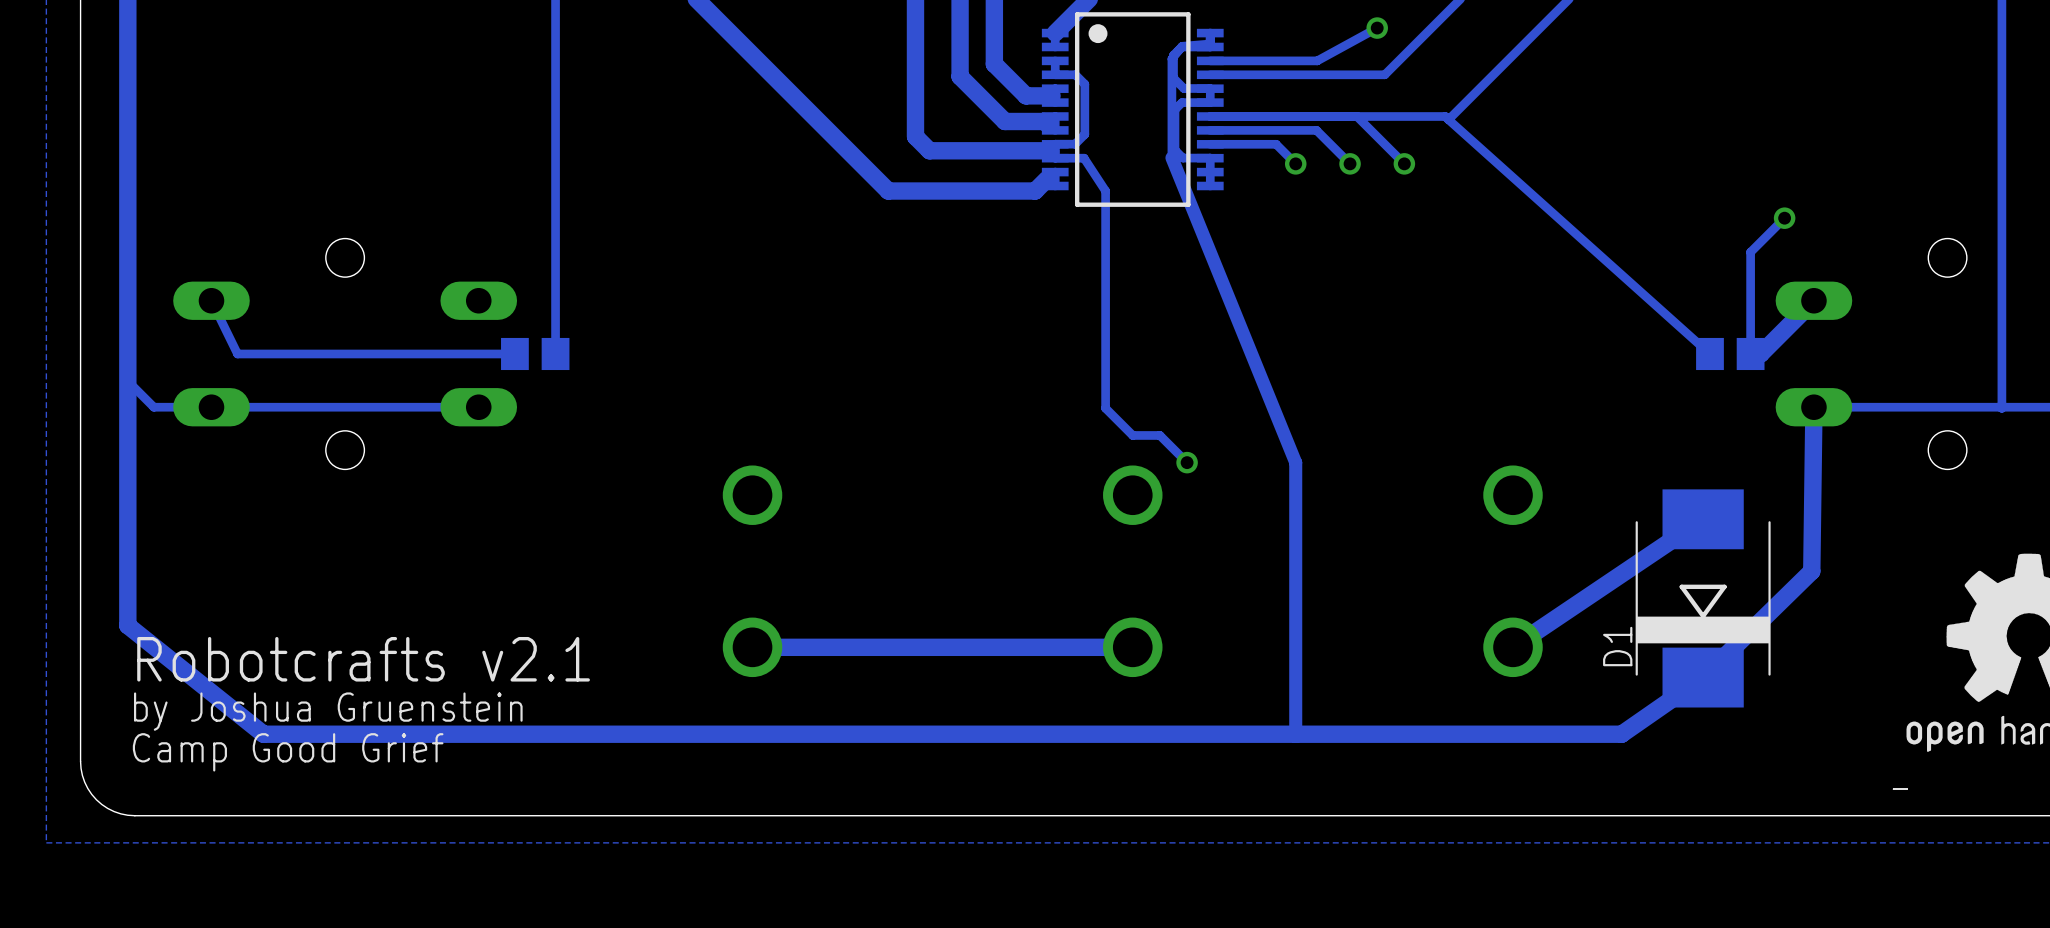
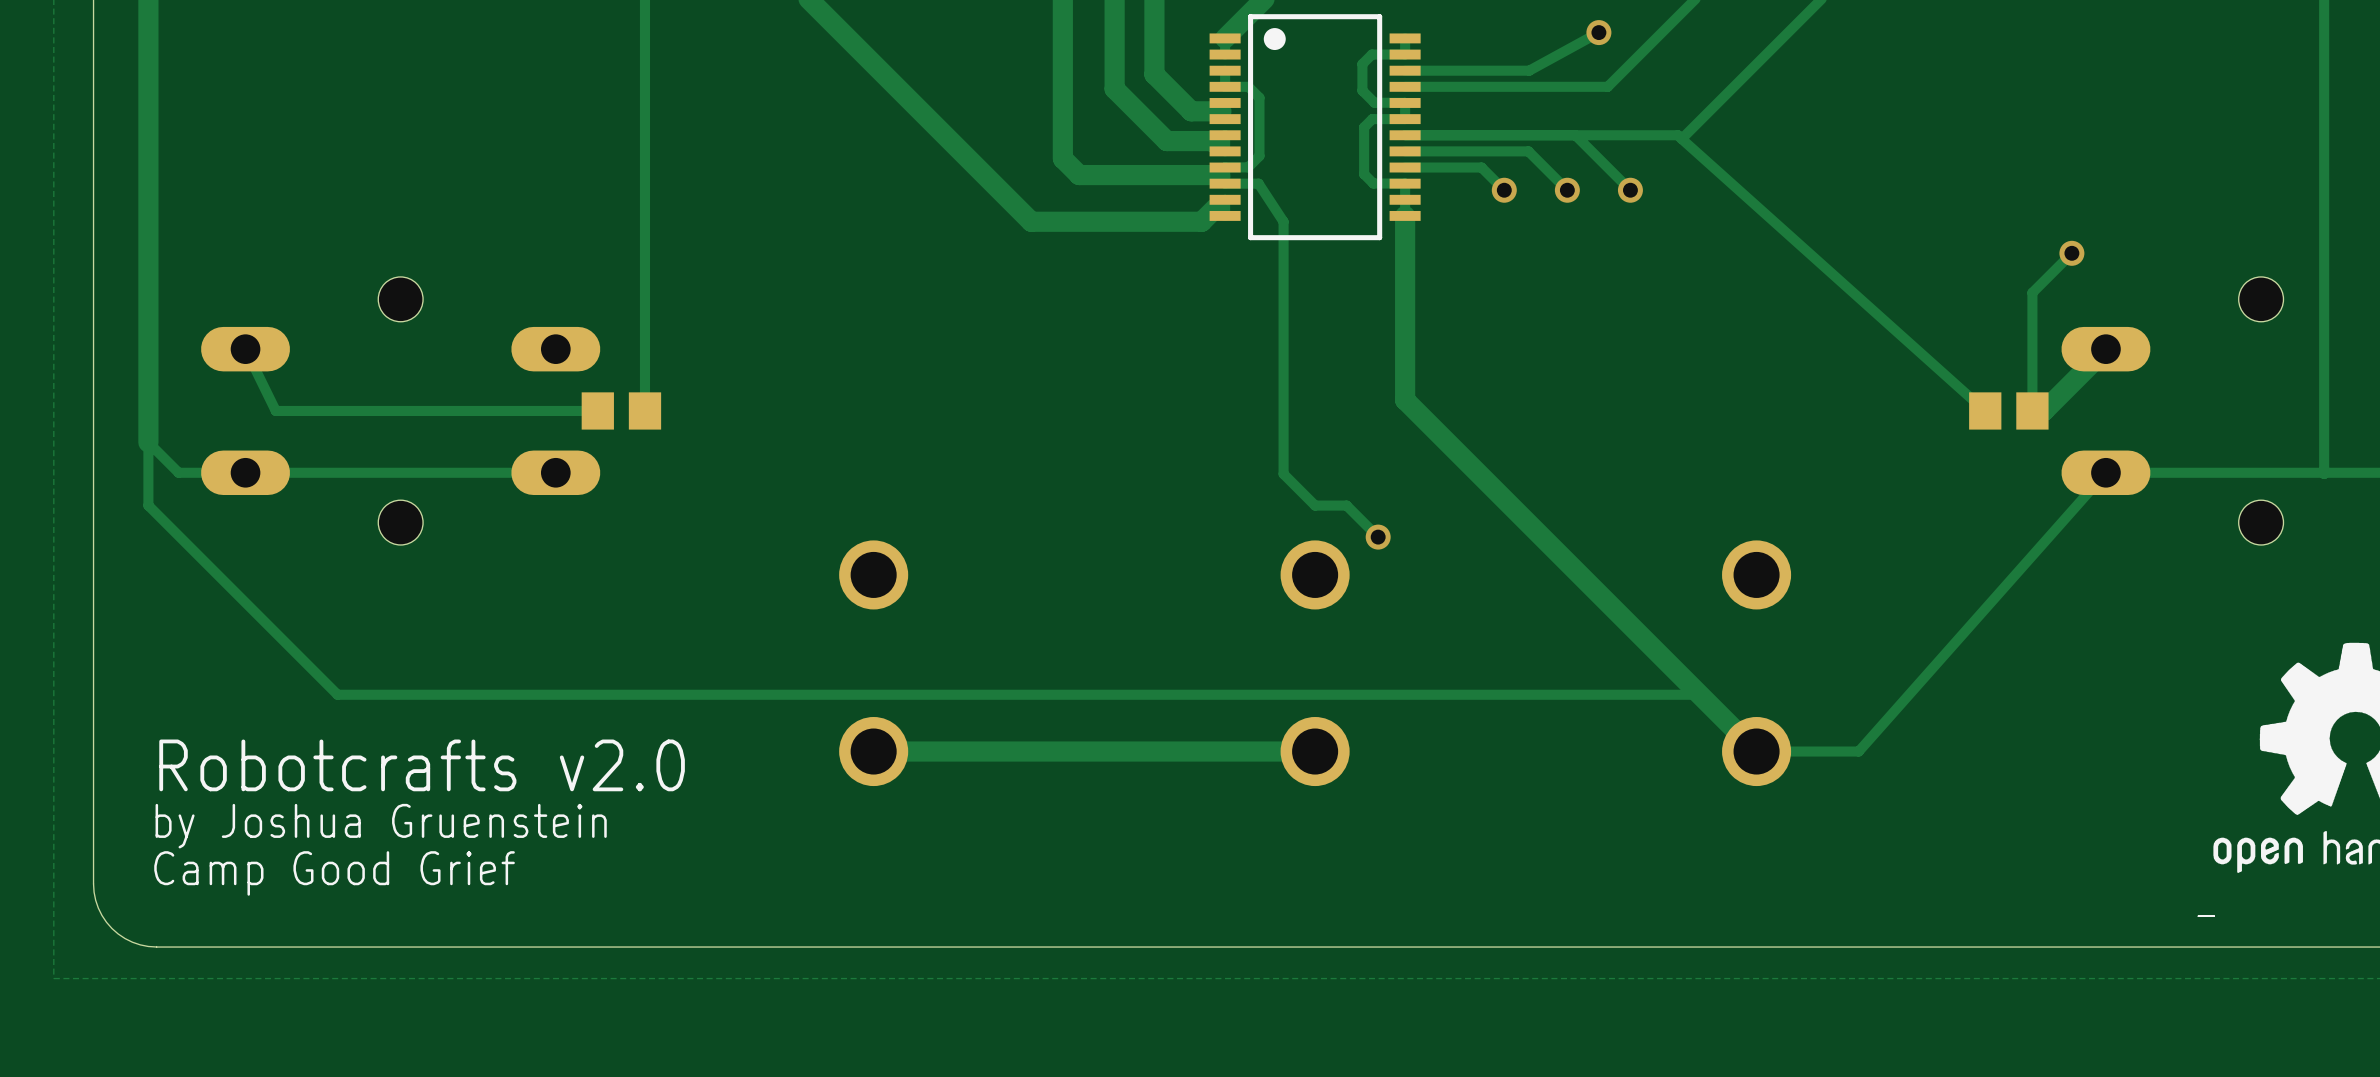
track: (1210, 33) (1209, 44) (1182, 46) (1171, 58) (1171, 157) (1295, 462) (1295, 734) -> none
track: none -> (1405, 215) (1405, 400) (1756, 751)
track width: thick (127, 381) (127, 435) -> thin (148, 442) (148, 505)
track: (1813, 407) (1811, 571) (1703, 677) (1621, 734) (263, 734) (127, 625) (127, 435) -> (1756, 751) (1699, 694) (337, 694) (148, 505)
track: (1703, 519) (1513, 647) -> (2105, 472) (1858, 751) (1756, 751)
D1: (1703, 598) -> none
text: Robotcrafts v2.1 (363, 659) -> Robotcrafts v2.0 (422, 765)

